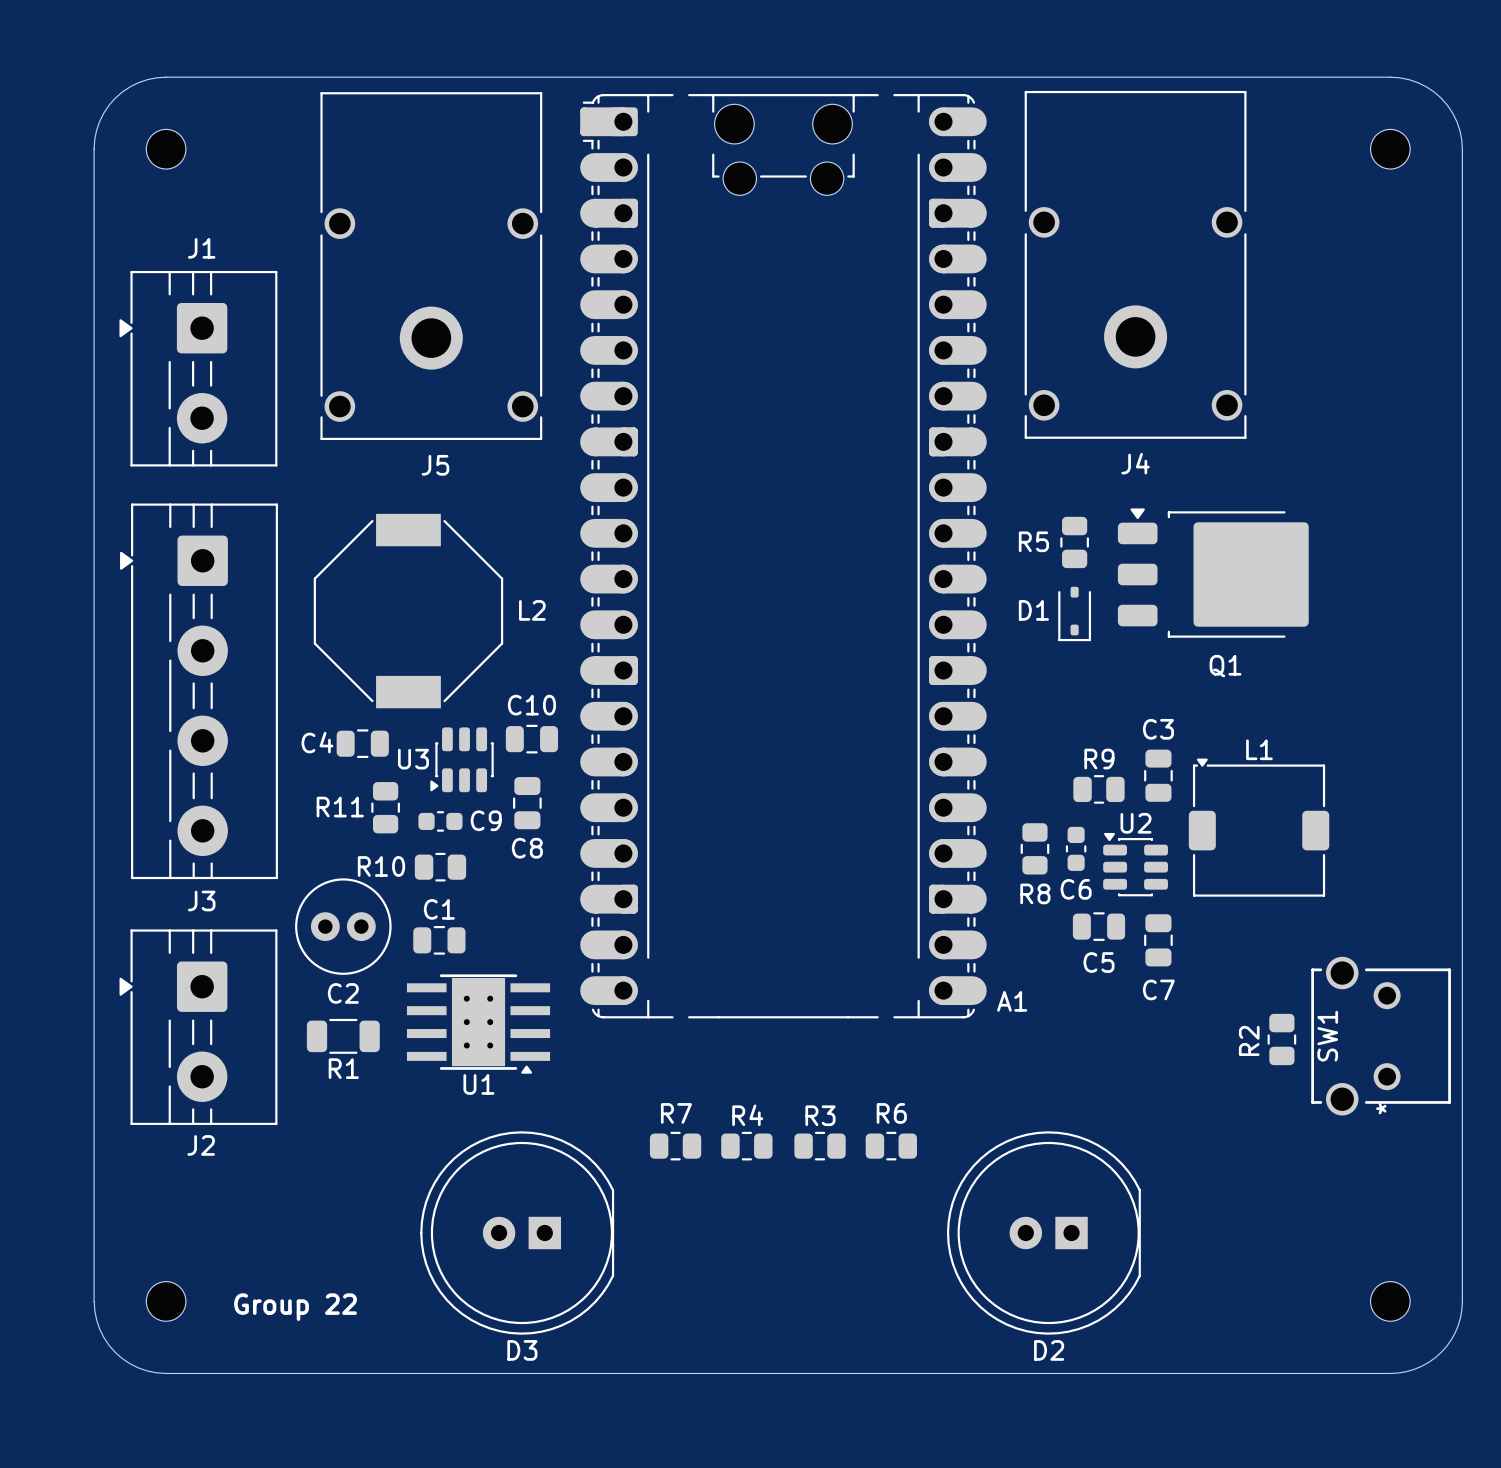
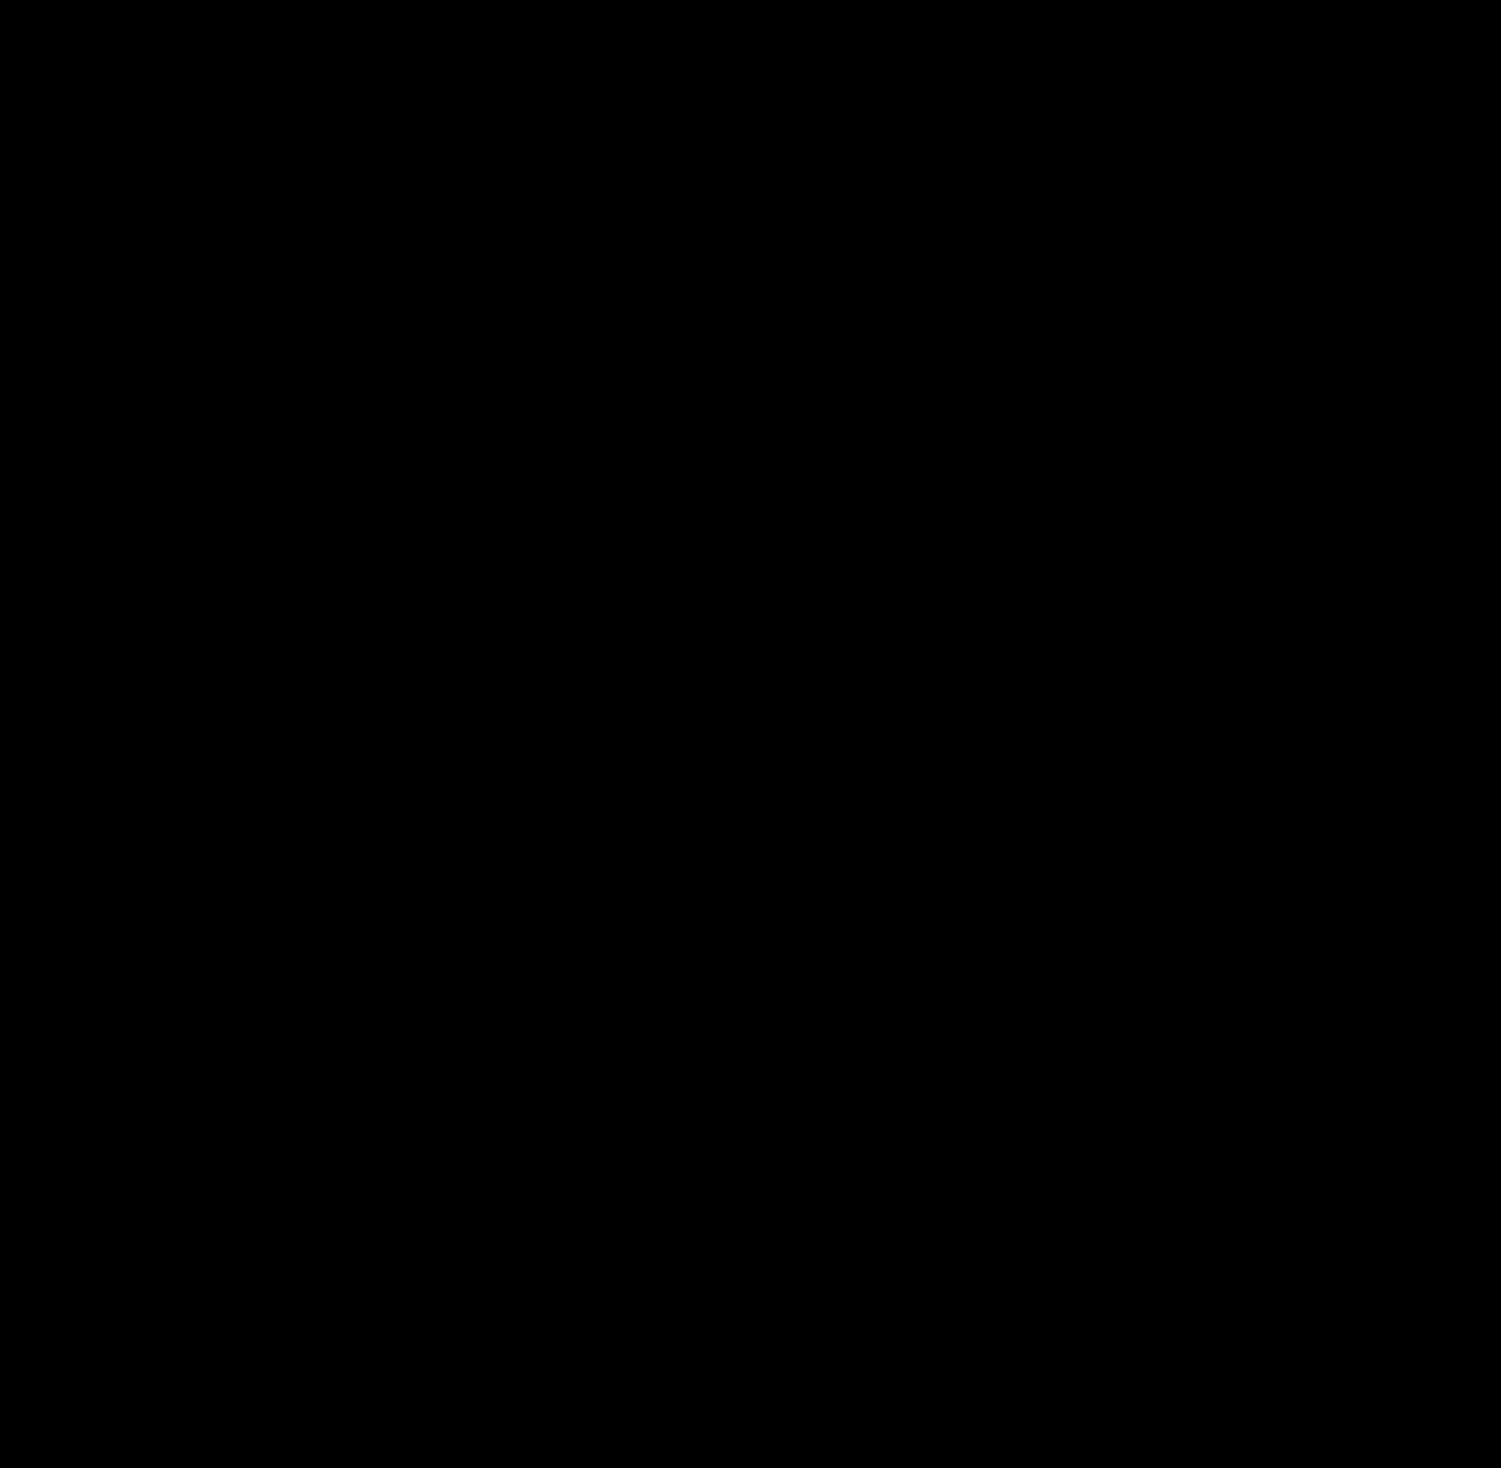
part: (166, 149) -> none
part: (1390, 149) -> none
J4: (1135, 264) -> none
J5: (431, 266) -> none
J1: (198, 368) -> none
R5: (1074, 542) -> none
A1: (783, 556) -> none
Q1: (1213, 573) -> none
L2: (408, 611) -> none
D1: (1074, 613) -> none
J3: (199, 691) -> none
C10: (531, 739) -> none
C4: (362, 743) -> none
U3: (462, 759) -> none
C3: (1158, 775) -> none
R9: (1098, 789) -> none
C8: (527, 803) -> none
R11: (385, 807) -> none
C9: (440, 821) -> none
L1: (1259, 827) -> none
R8: (1034, 848) -> none
C6: (1076, 848) -> none
U2: (1135, 864) -> none
R10: (440, 867) -> none
C2: (343, 926) -> none
C5: (1098, 926) -> none
C1: (439, 940) -> none
C7: (1158, 940) -> none
U1: (478, 1024) -> none
J2: (198, 1027) -> none
R1: (343, 1036) -> none
SW1: (1381, 1036) -> none
R2: (1281, 1039) -> none
R7: (675, 1146) -> none
R4: (746, 1146) -> none
R3: (820, 1146) -> none
R6: (891, 1146) -> none
D3: (517, 1233) -> none
D2: (1043, 1233) -> none
board edge: (94, 1301) (94, 149) (99, 121) (115, 98) (138, 82) (166, 77) (1390, 77) (1417, 82) (1441, 98) (1456, 121) (1462, 149) (1462, 1301) (1460, 1317) (1455, 1332) (1446, 1346) (1435, 1357) (1414, 1369) (1390, 1373) (166, 1373) (138, 1367) (115, 1352) (99, 1329) (94, 1301) -> none
part: (166, 1301) -> none
part: (1390, 1301) -> none
text: Group 22 (295, 1307) -> none

